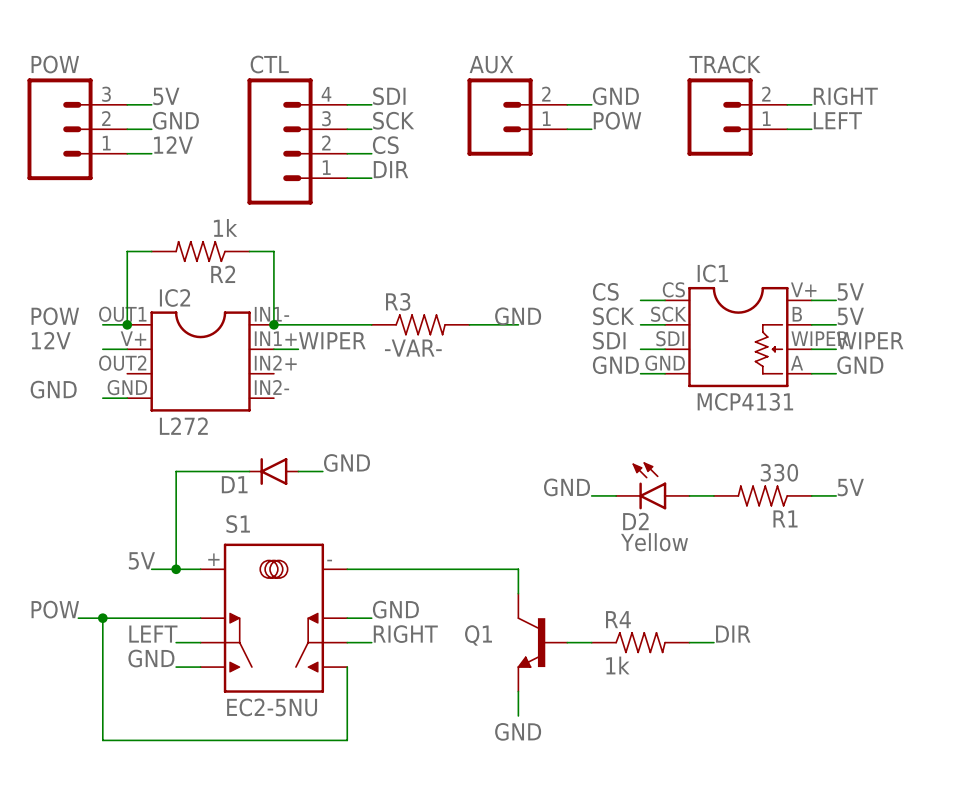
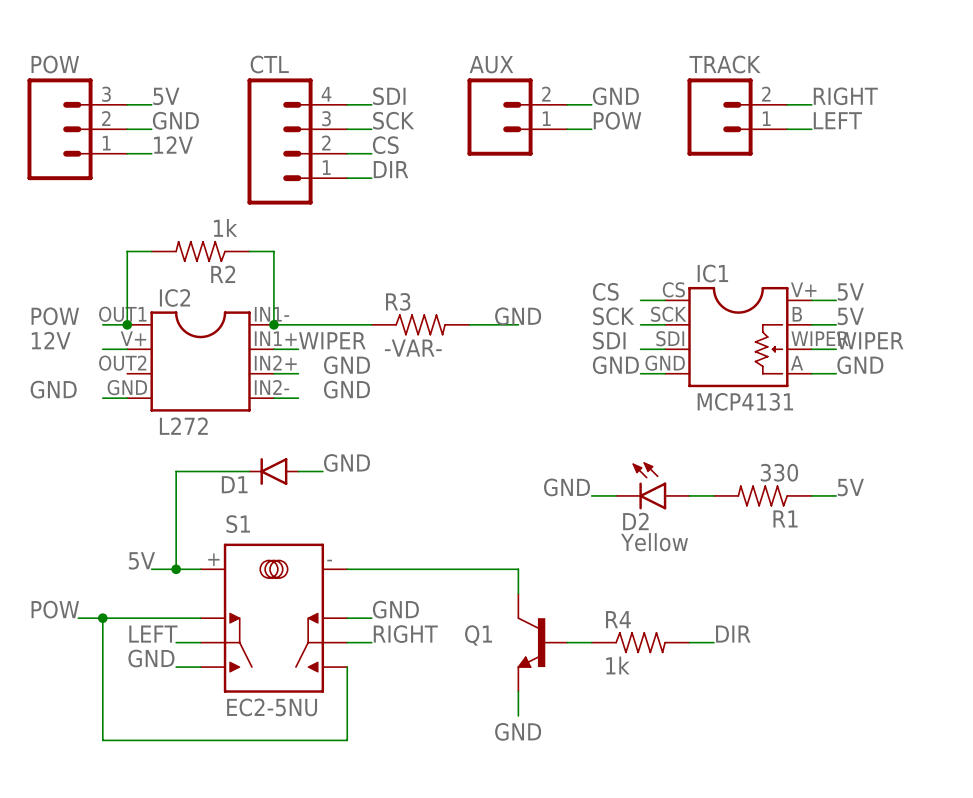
label: none -> GND (347, 365)
wire: none -> (273, 373) (298, 373)
label: none -> GND (347, 389)
wire: none -> (273, 398) (298, 398)

